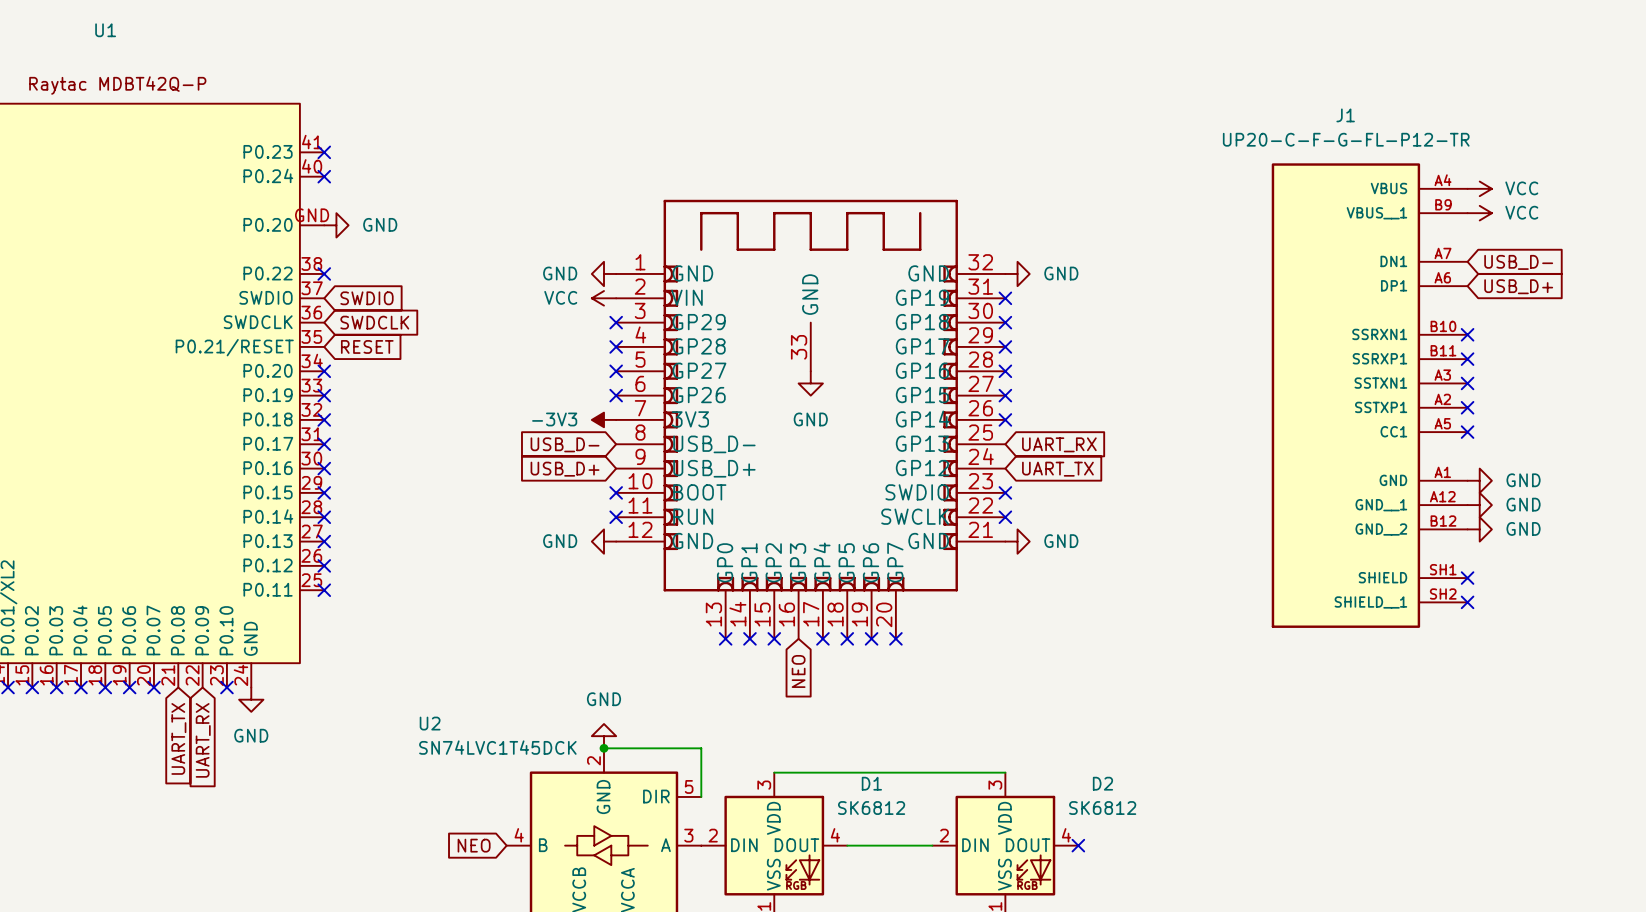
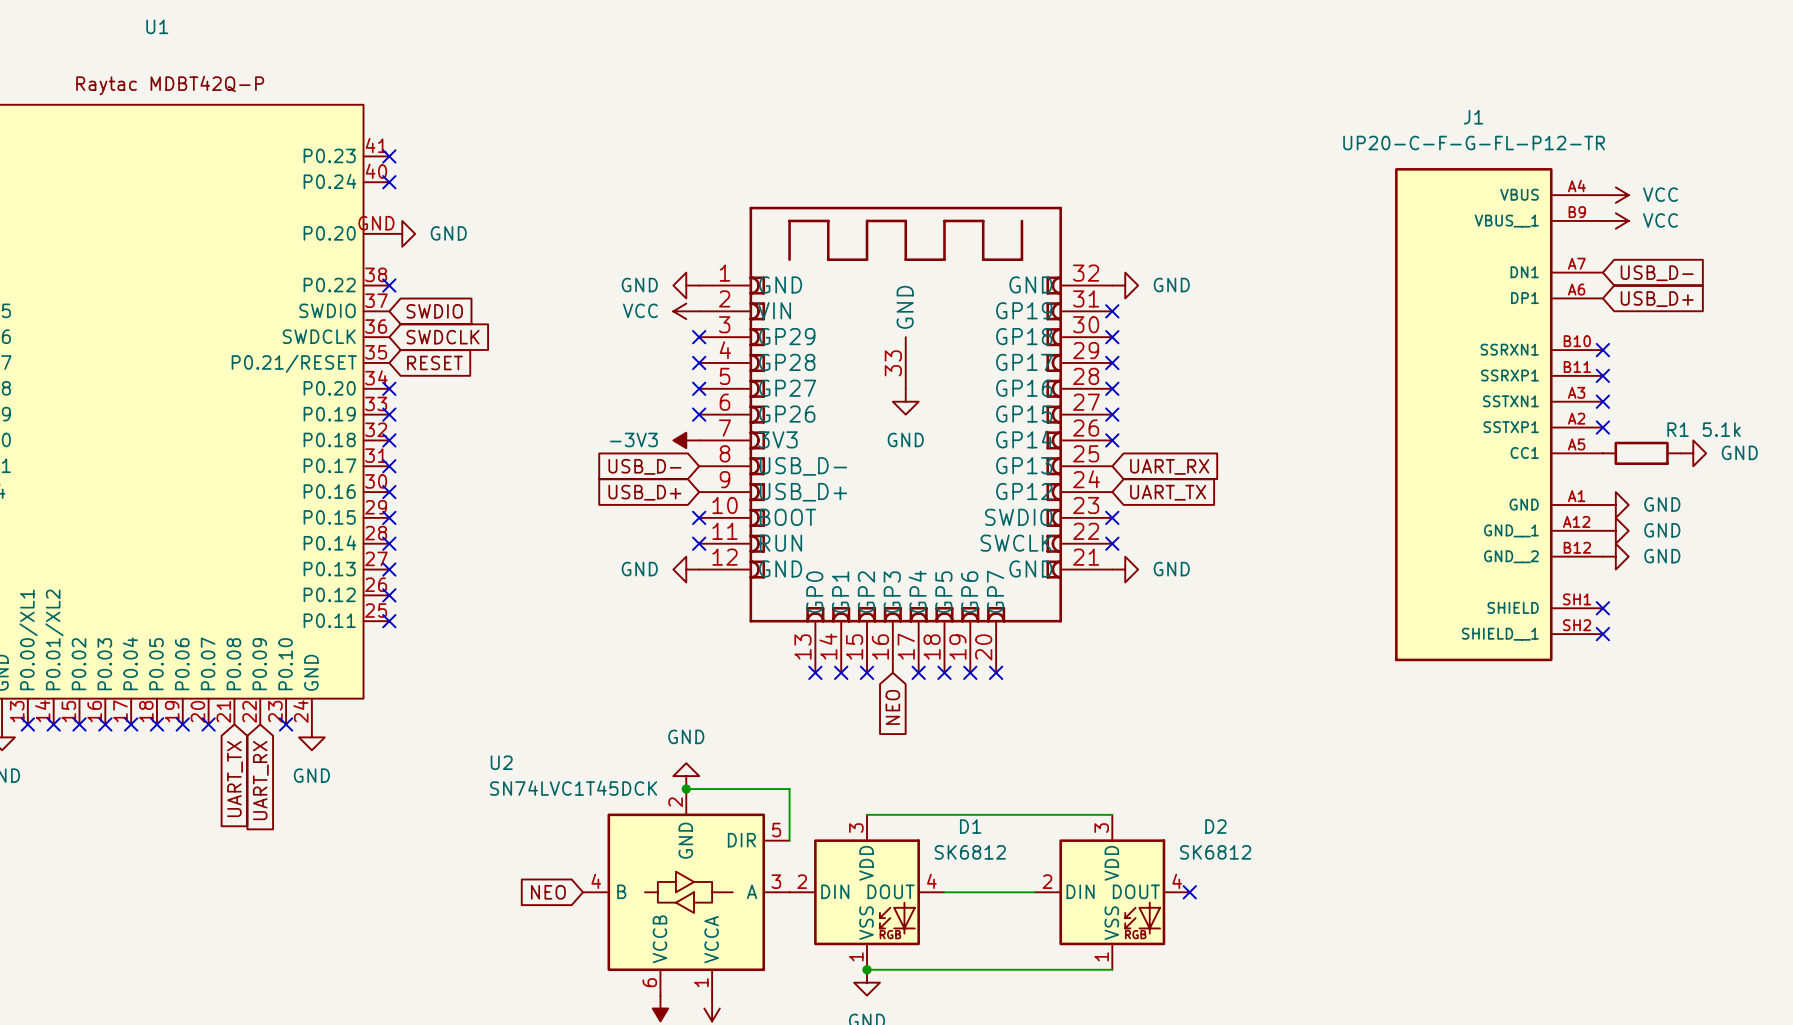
no-connect mark: (1467, 432) -> none
R1: none -> 5.1k (1641, 453)
power symbol: none -> GND (1693, 453)

